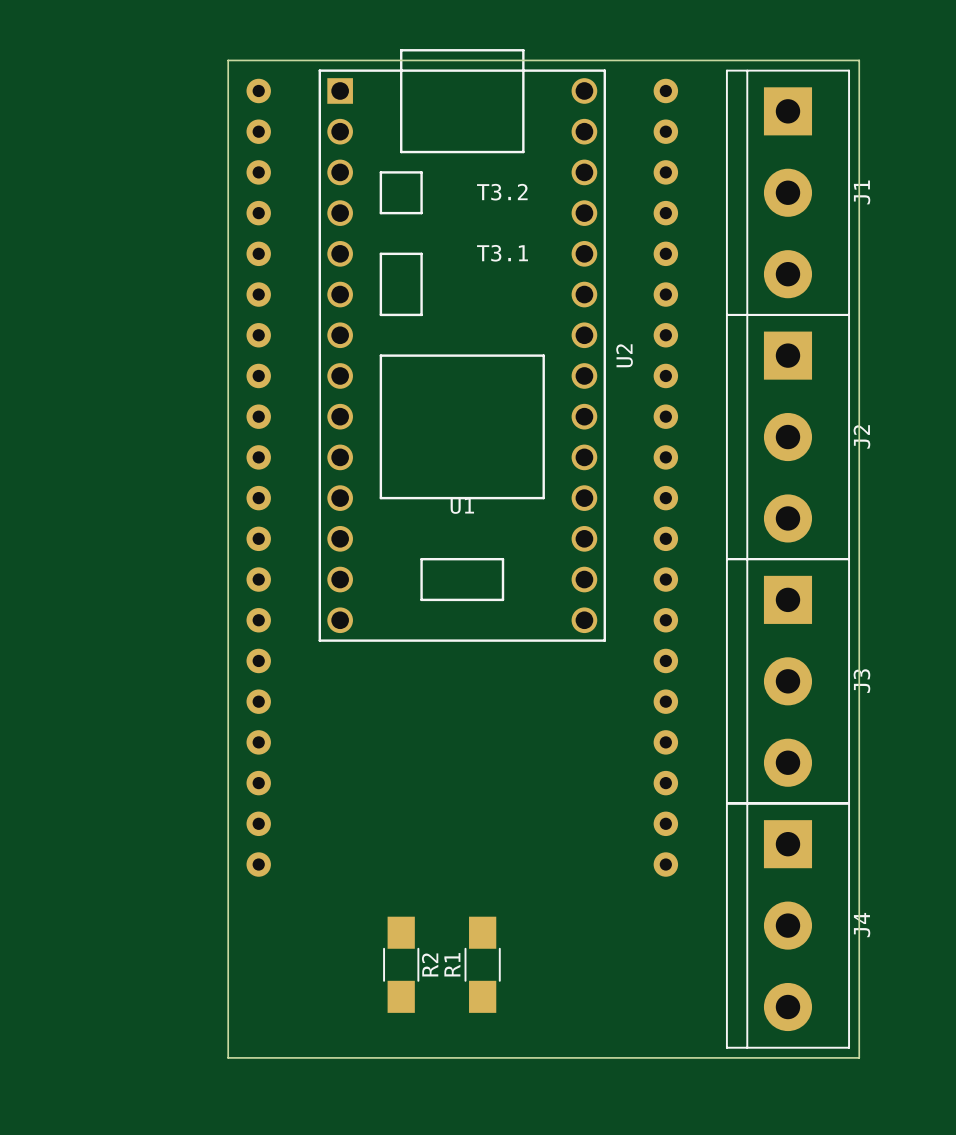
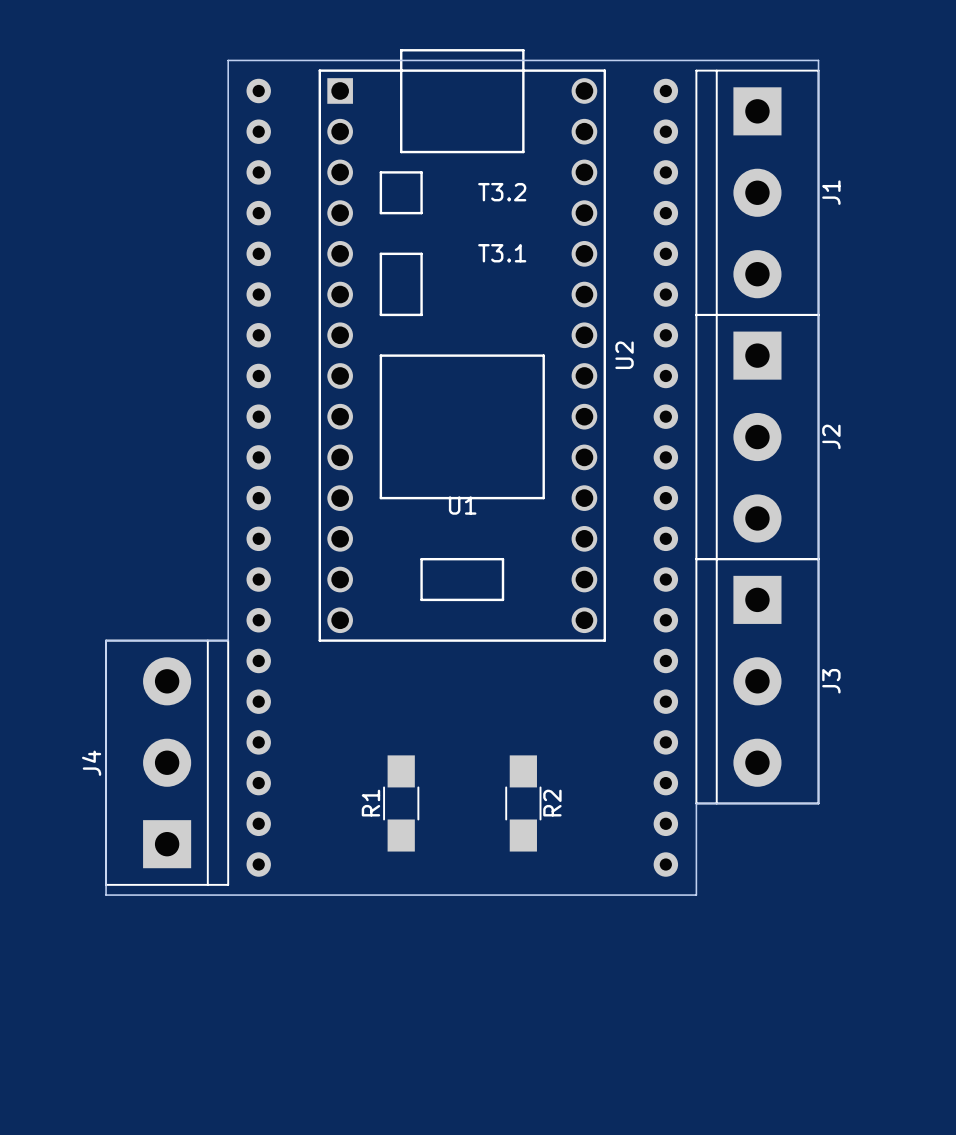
board edge: (818, 60) (859, 60) (859, 1057) (228, 1057) (228, 640) -> (818, 60) (818, 803) (696, 803) (696, 895) (106, 895) (106, 640) (228, 640)
J1 position: (787, 192) -> (757, 192)
J2 position: (787, 437) -> (757, 437)
J3 position: (787, 681) -> (757, 681)
J4 rotation: 0° (787, 925) -> 180° (167, 762)
J4 position: (787, 925) -> (167, 762)
R2 position: (401, 964) -> (523, 803)
R1 position: (482, 964) -> (401, 803)

